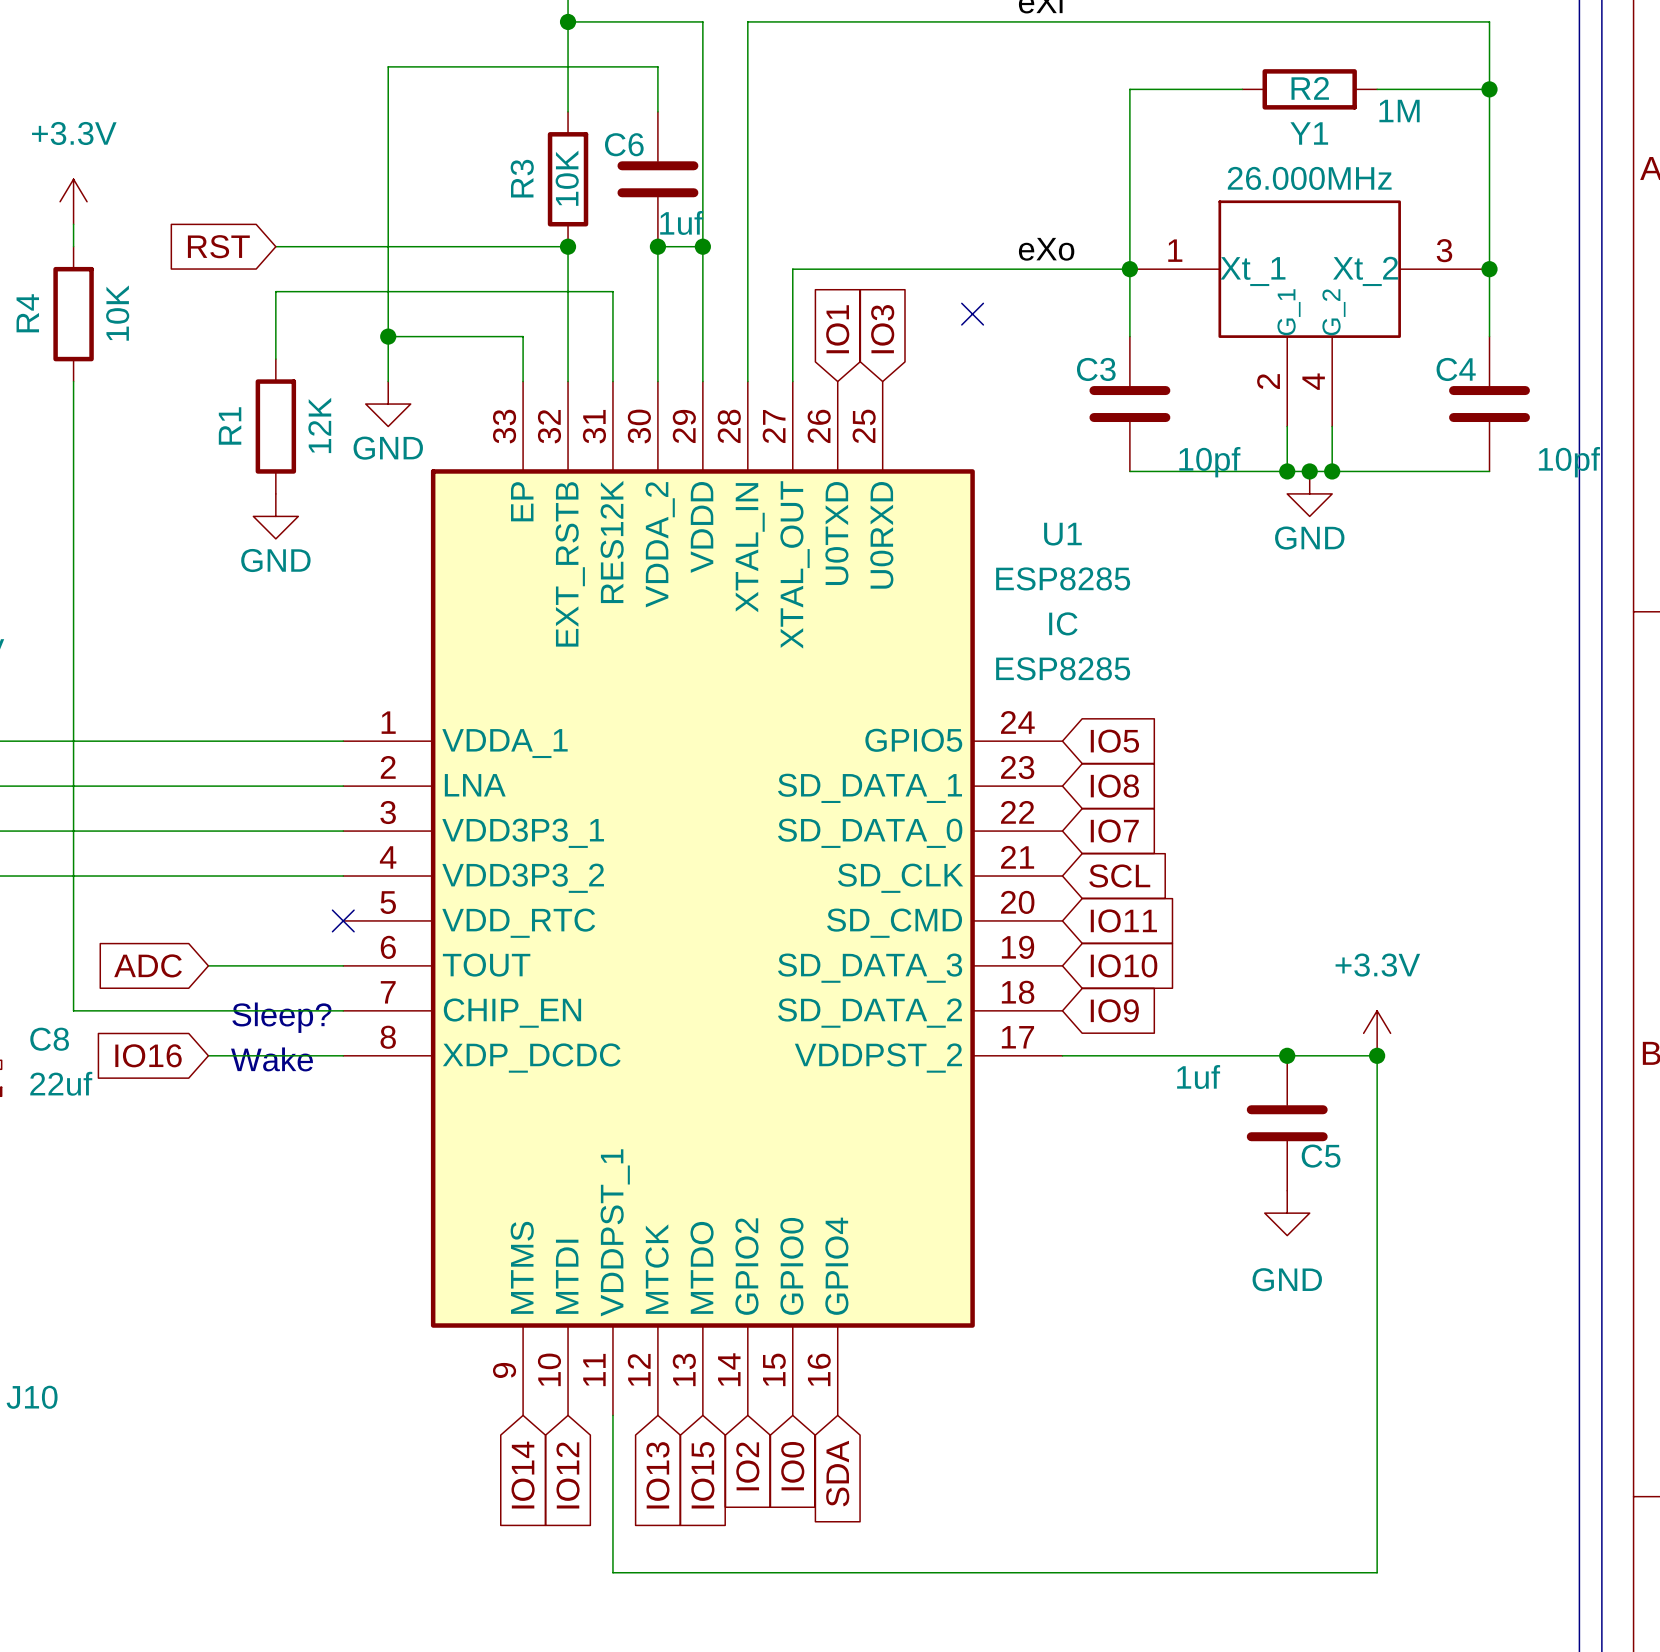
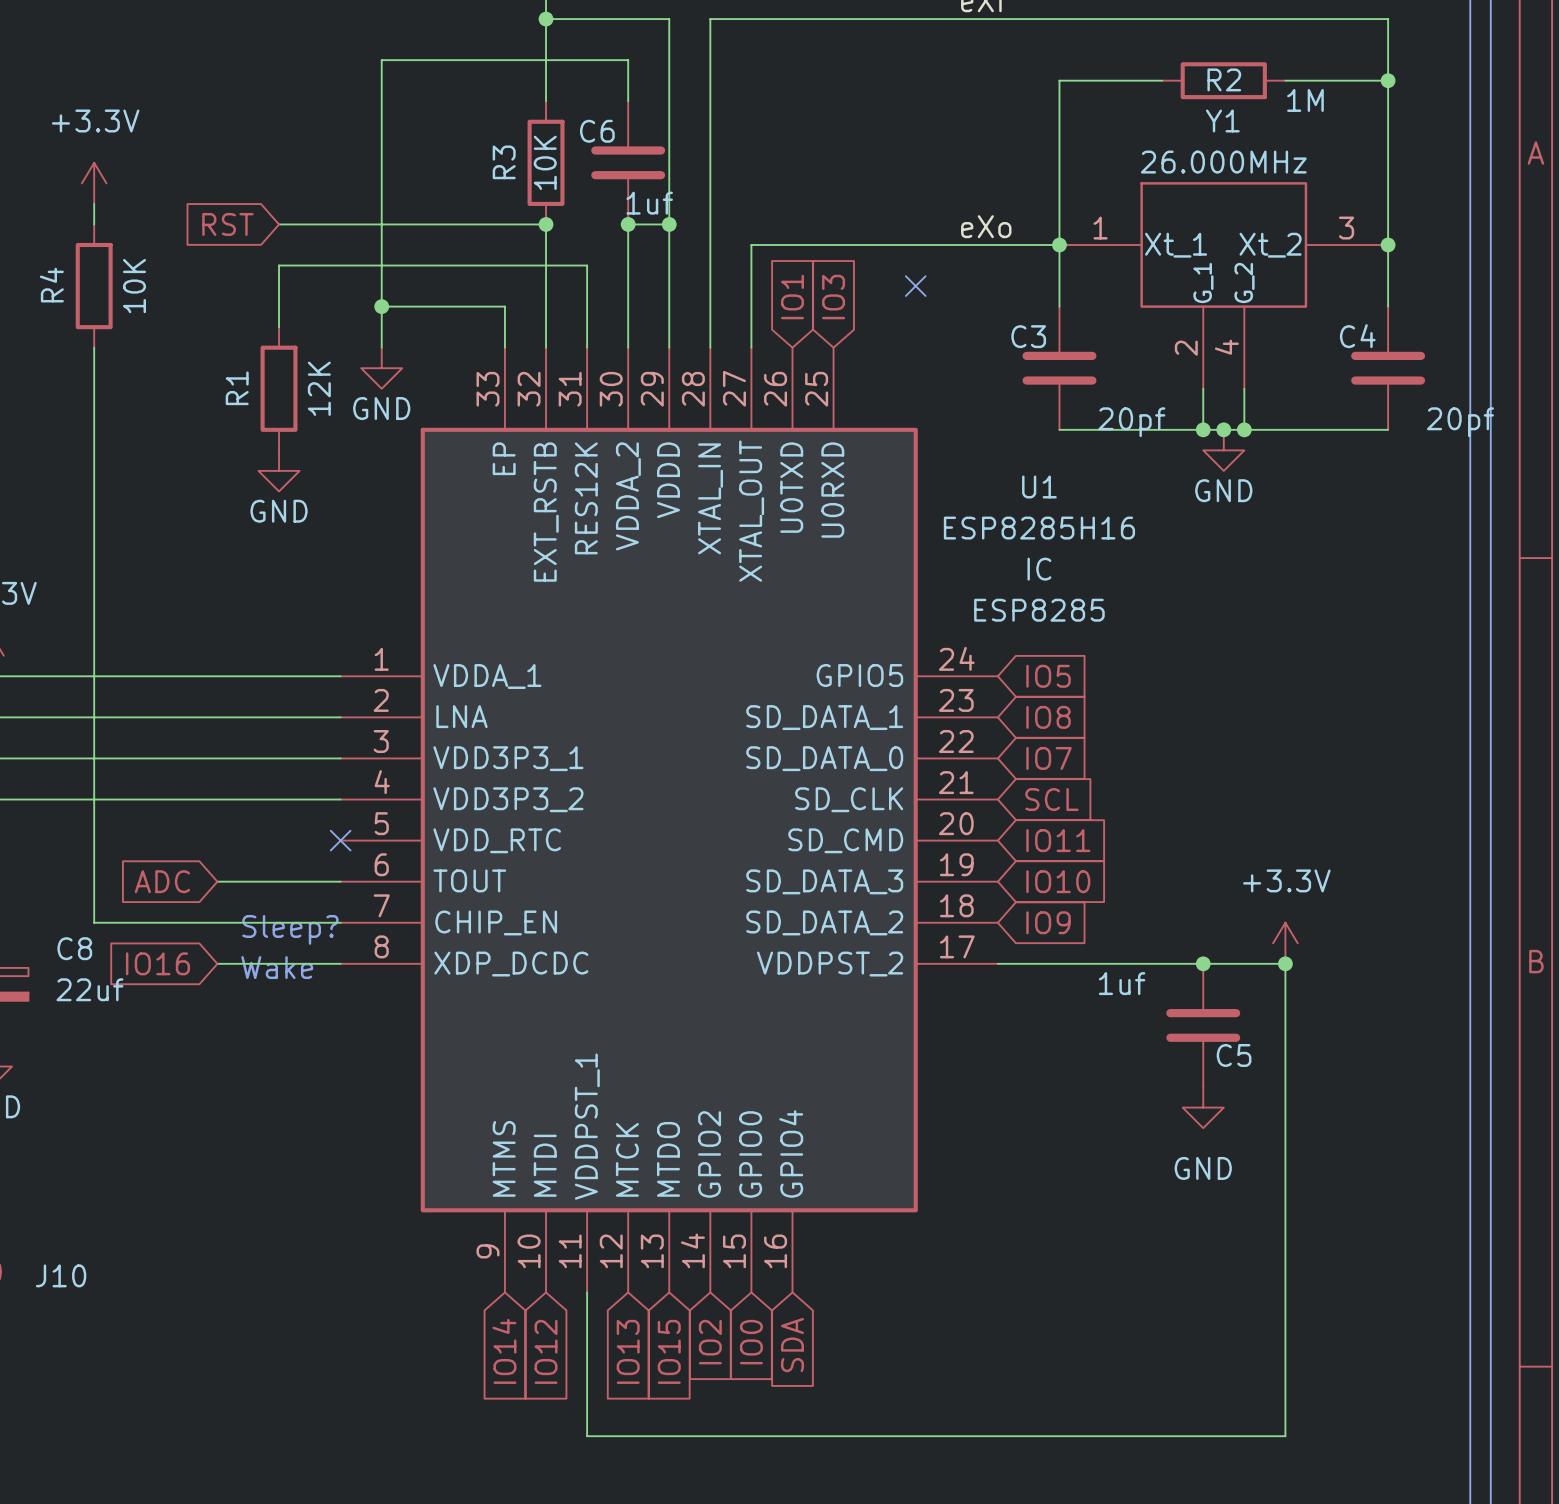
C3 value: 10pf (1209, 462) -> 20pf (1131, 422)
C4 value: 10pf (1569, 462) -> 20pf (1460, 422)
U1 name position: U1 (1062, 534) -> U1 (1039, 486)
U1 value: ESP8285 (1063, 578) -> ESP8285H16 (1039, 528)
U1 text position: IC (1063, 623) -> IC (1039, 569)
U1 text position: ESP8285 (1063, 668) -> ESP8285 (1039, 610)

